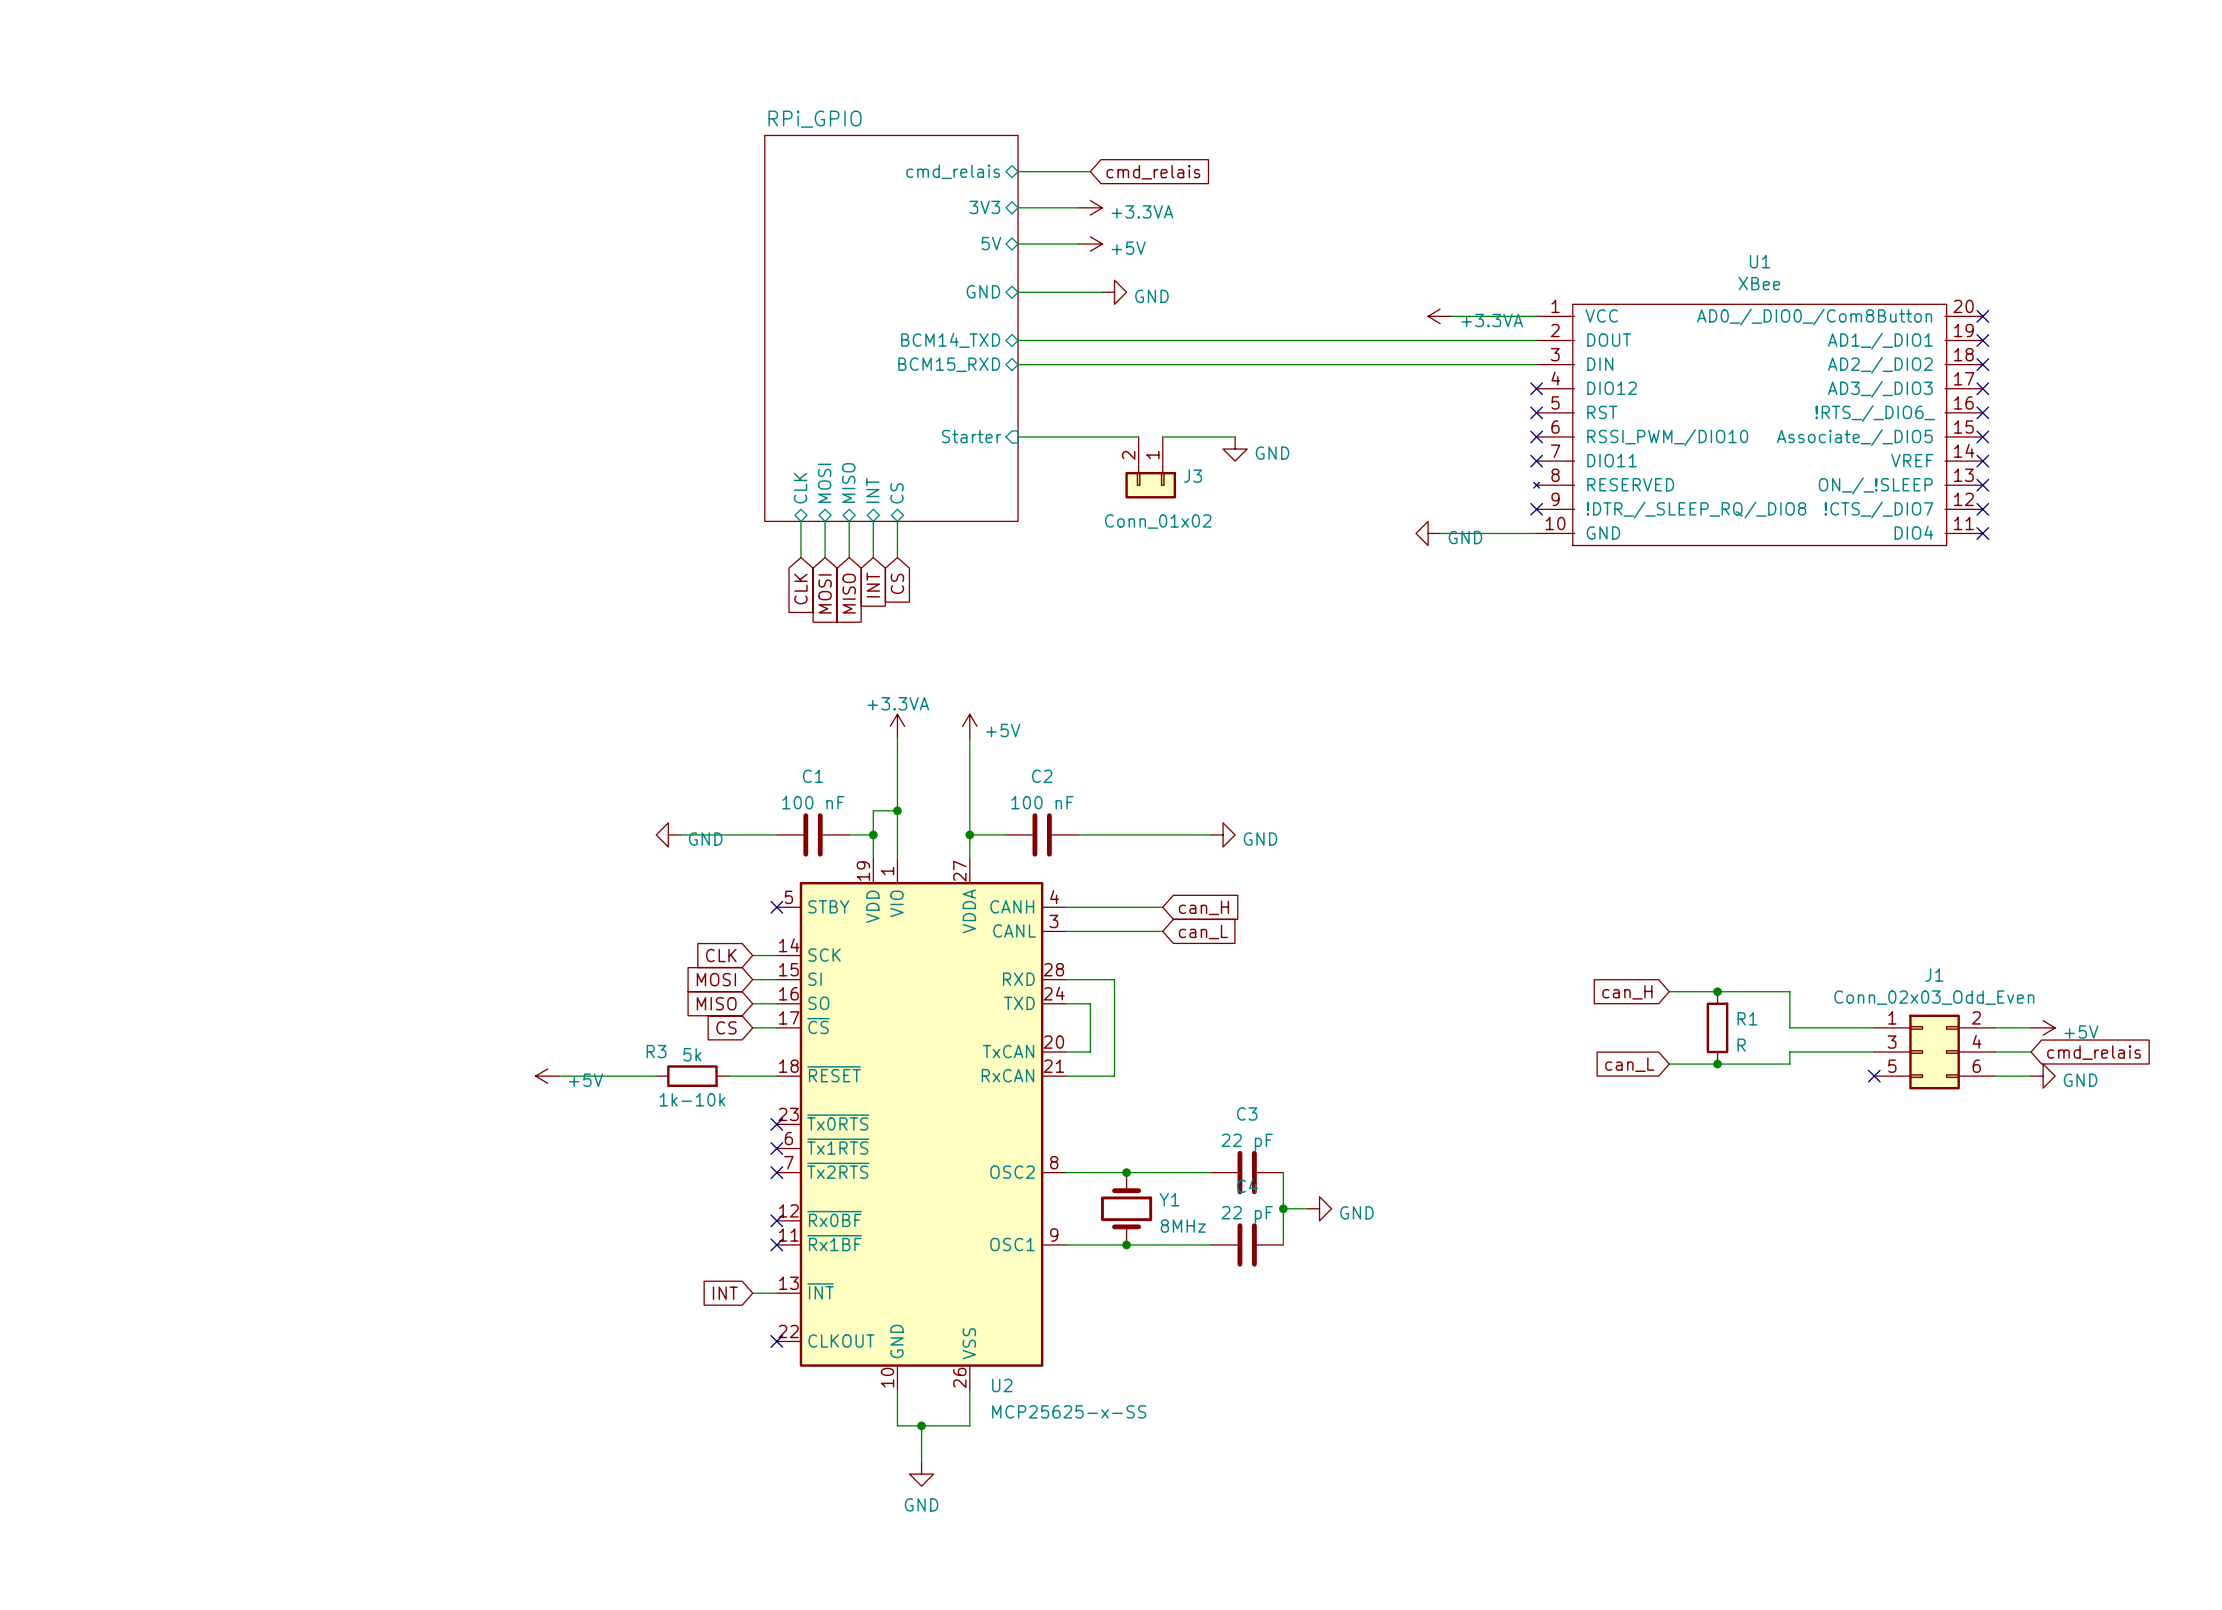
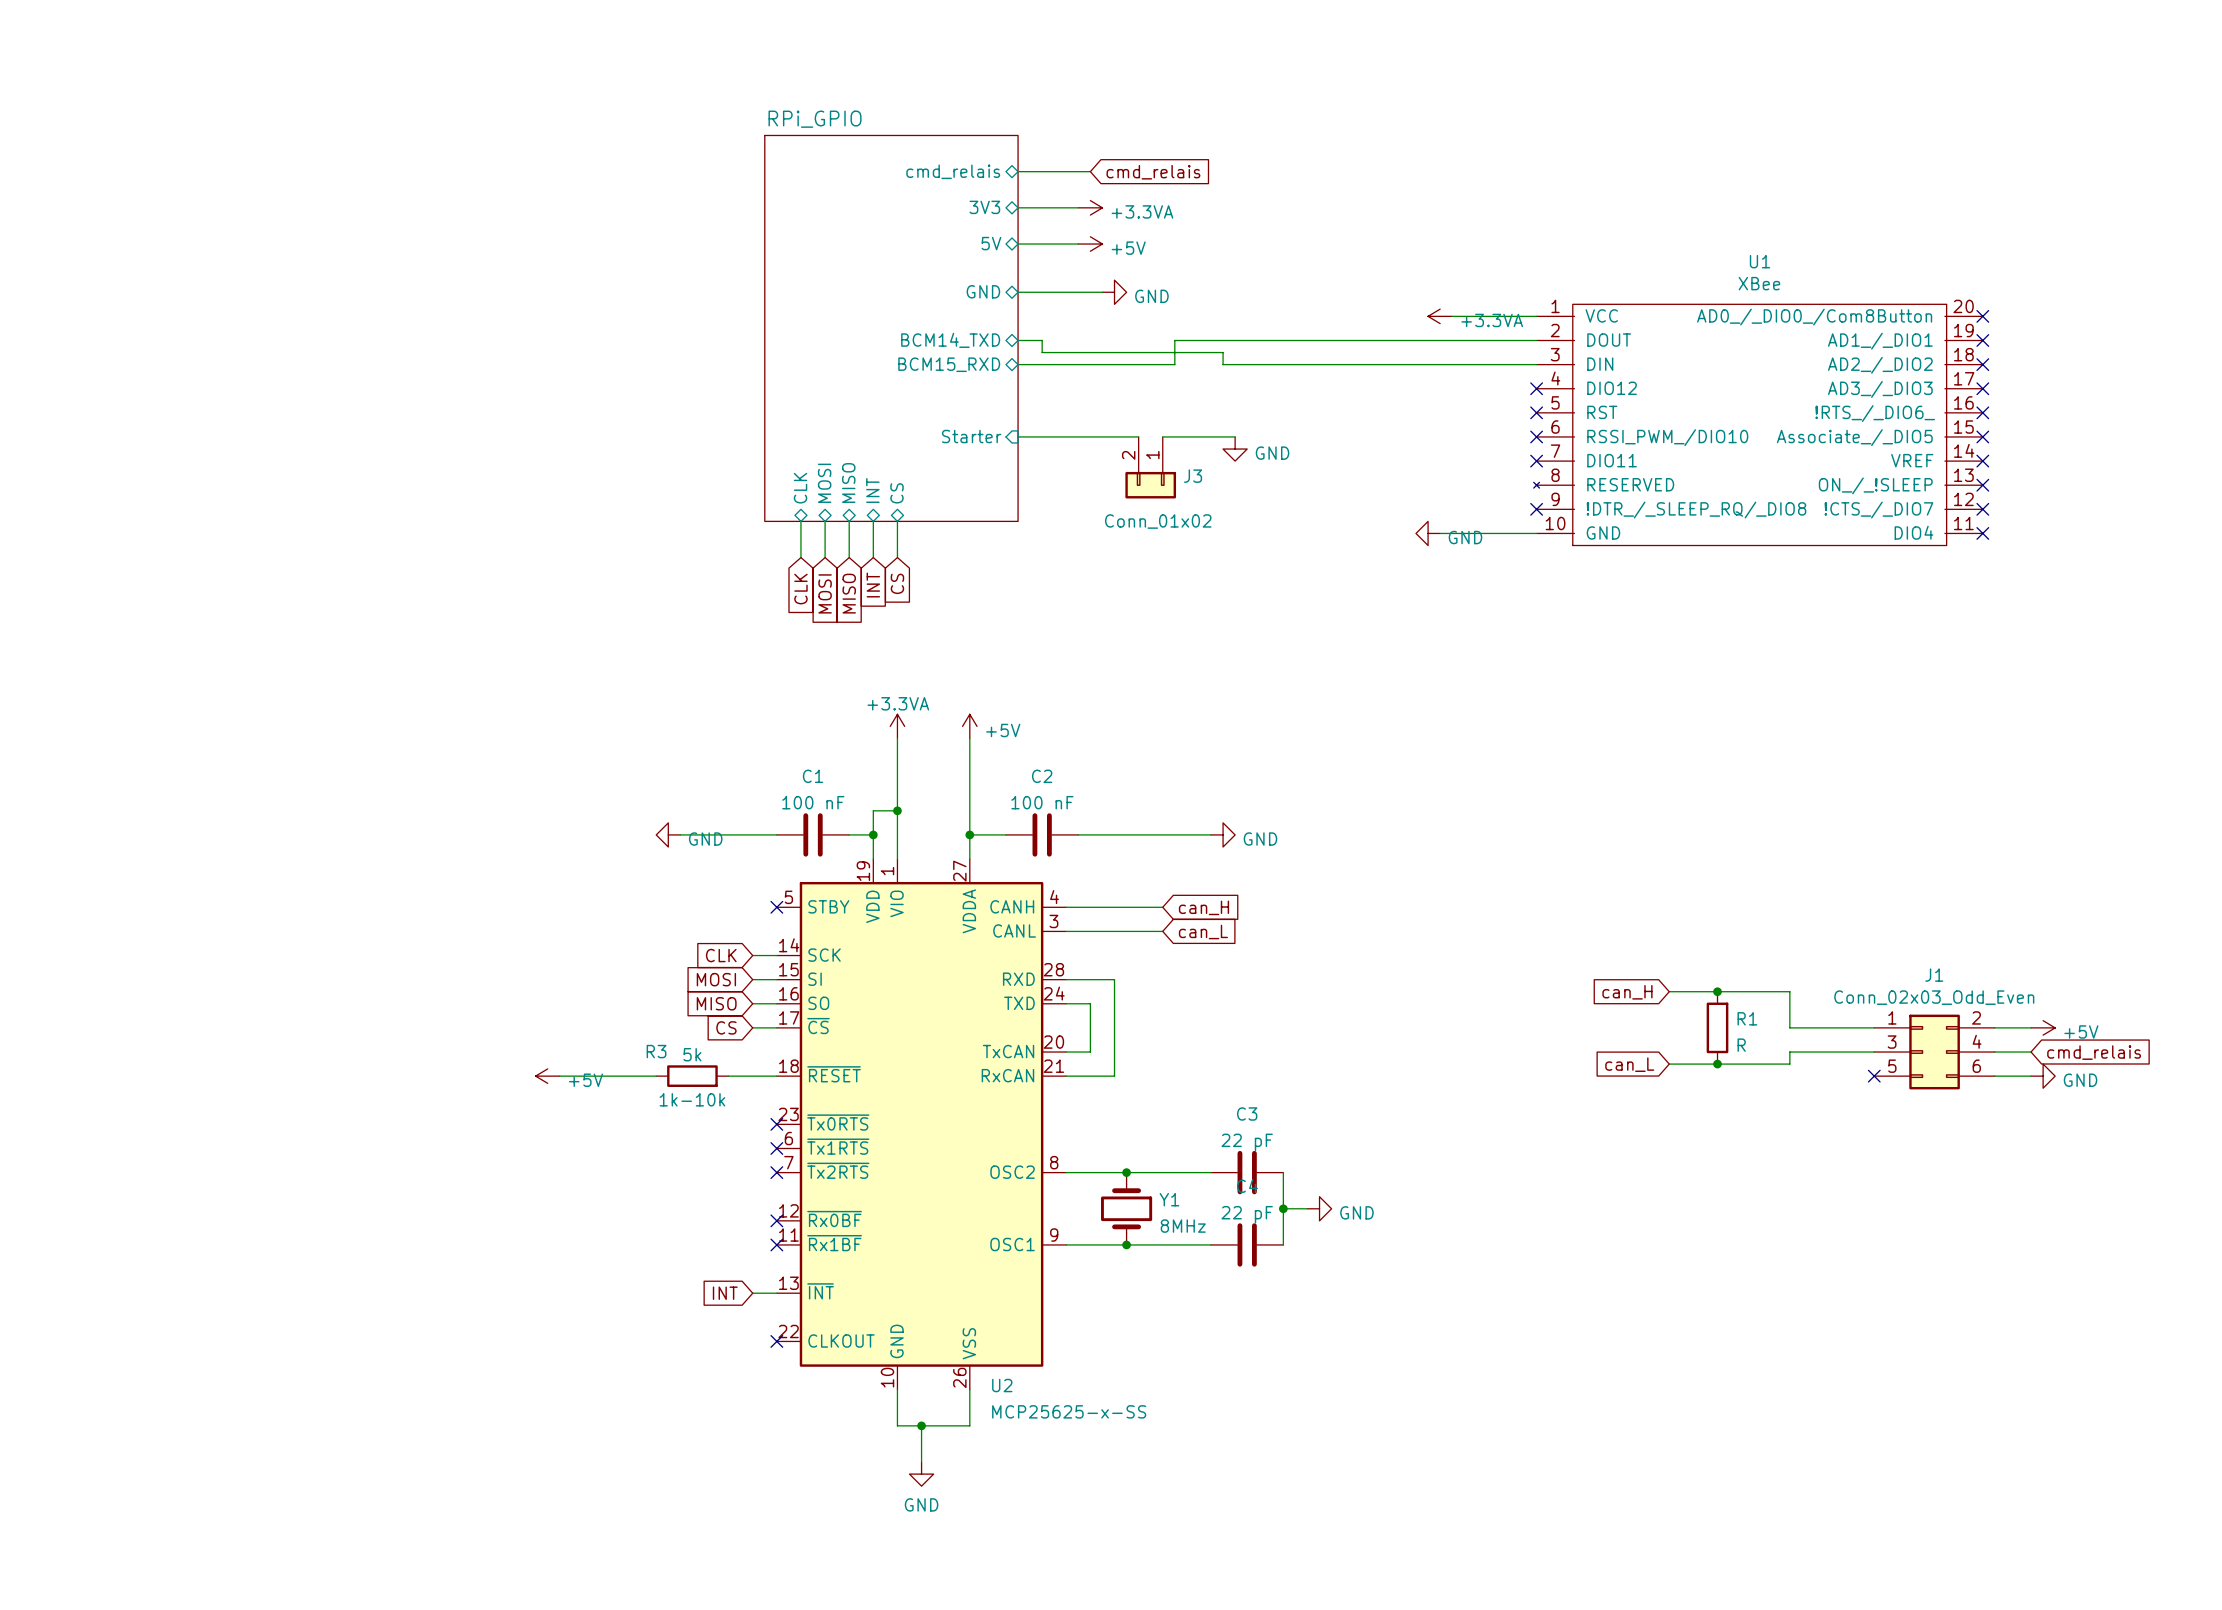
wire: (1042, 340) (1174, 340) -> (1042, 340) (1042, 352) (1223, 352) (1223, 364)
wire: (1174, 364) (1223, 364) -> (1174, 364) (1174, 340)

